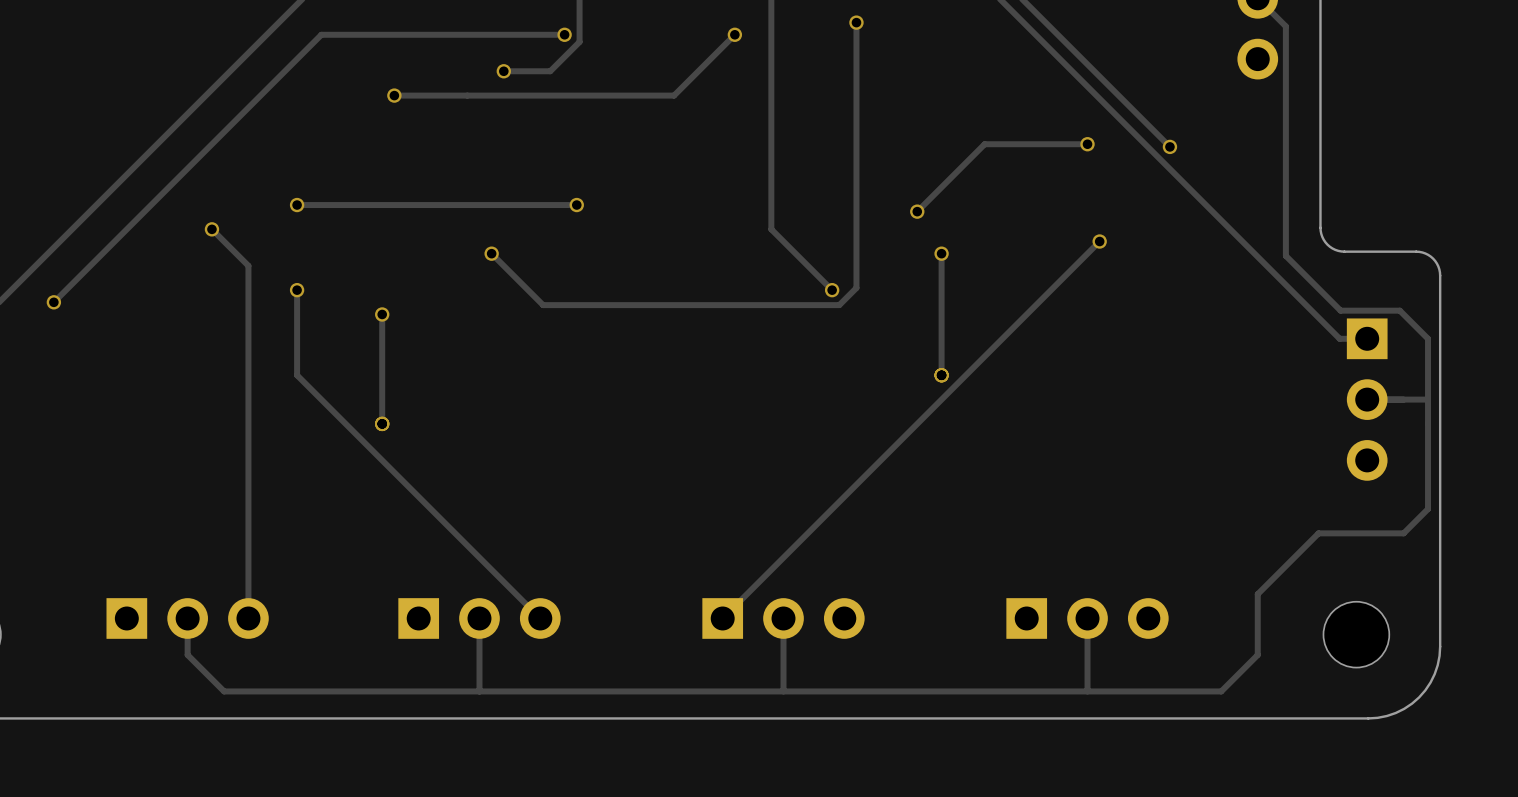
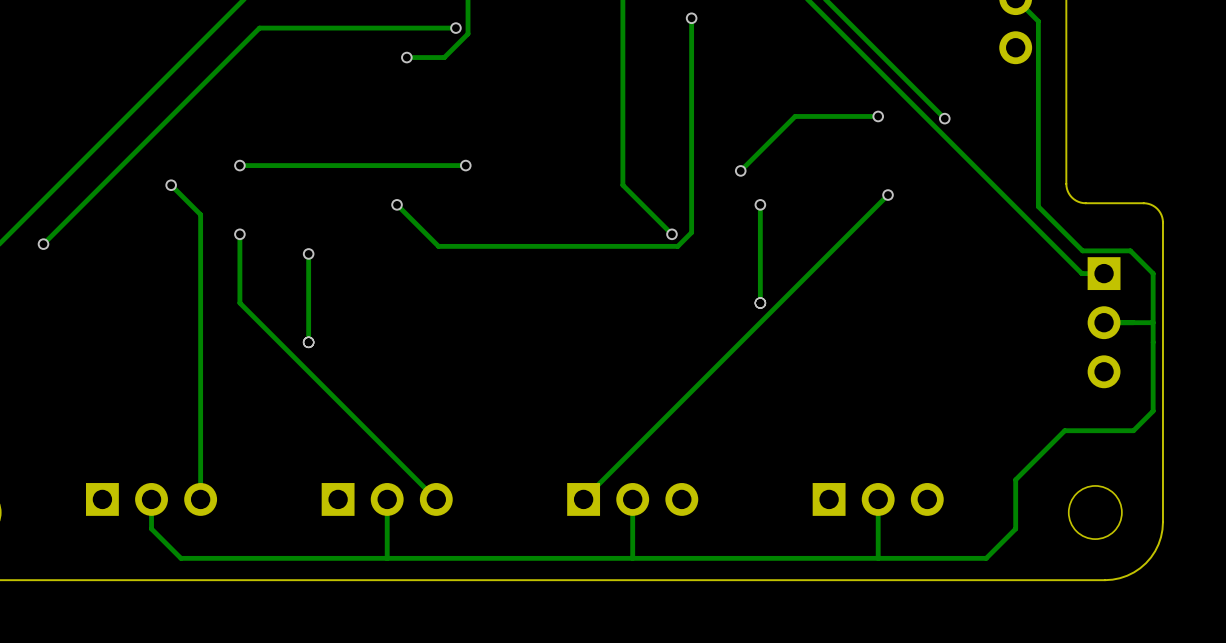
track: (734, 34) (674, 95) (394, 95) -> none
via: (734, 34) -> none
via: (394, 95) -> none

